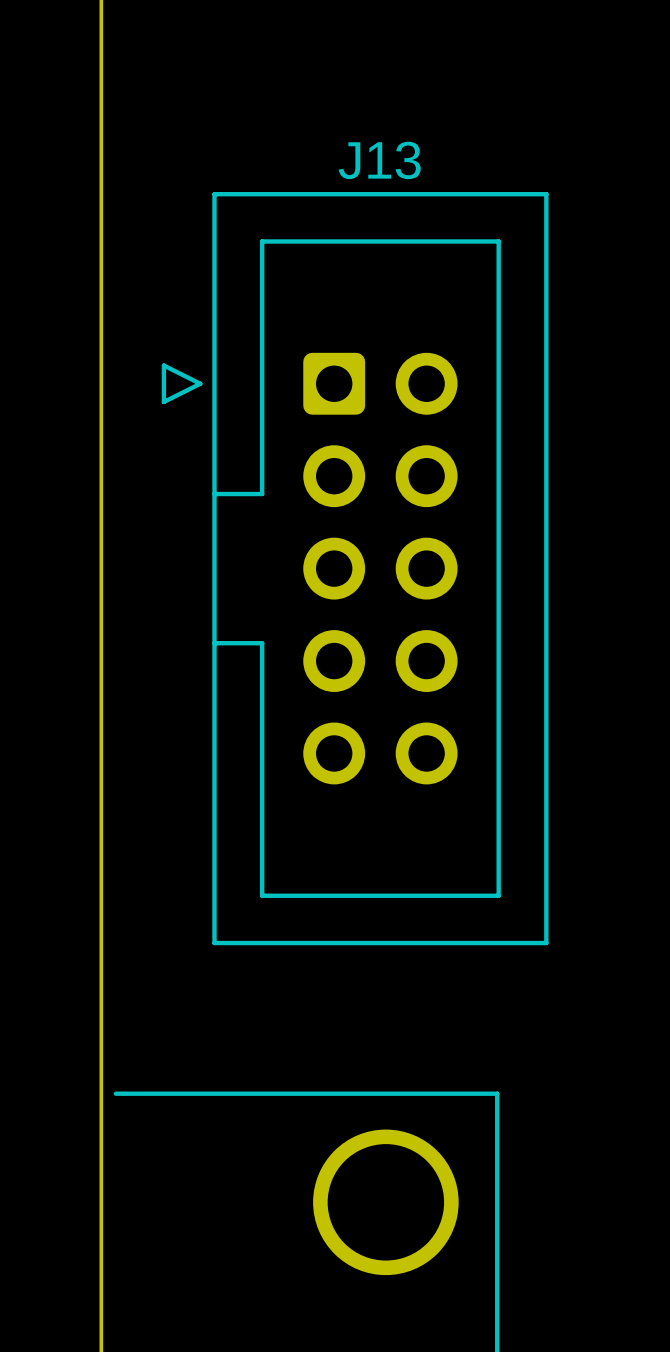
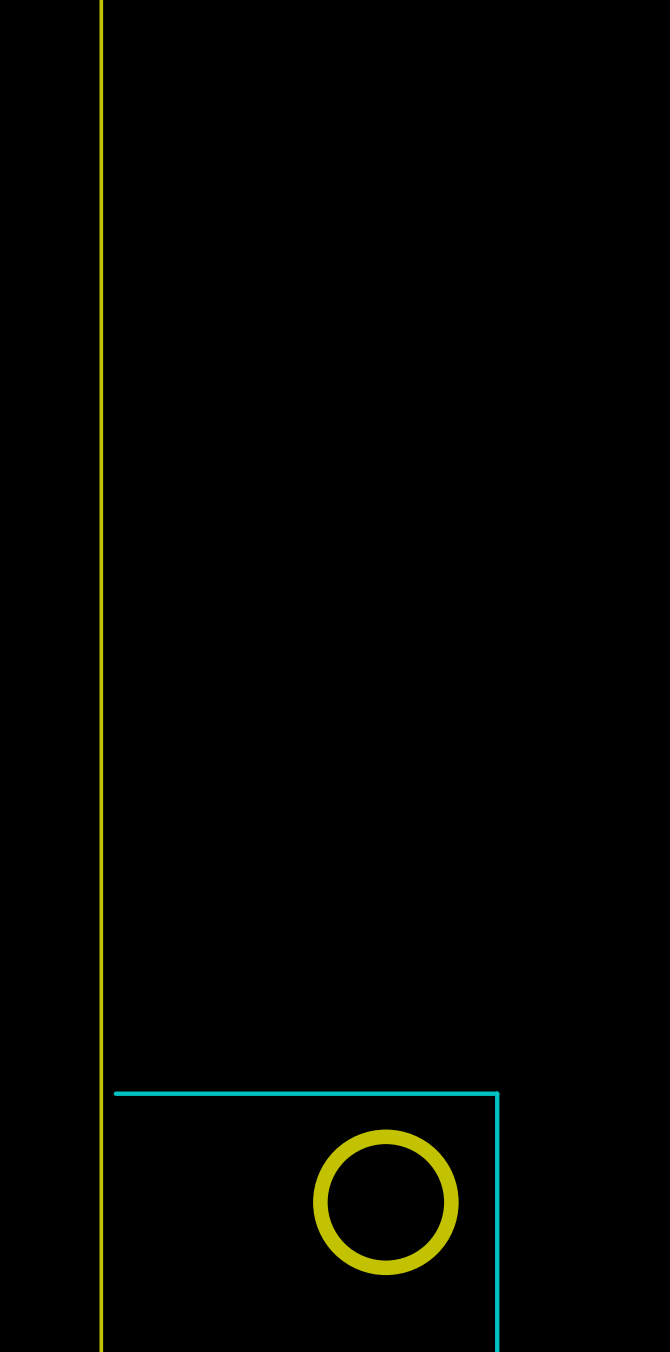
J13: (355, 568) -> none

